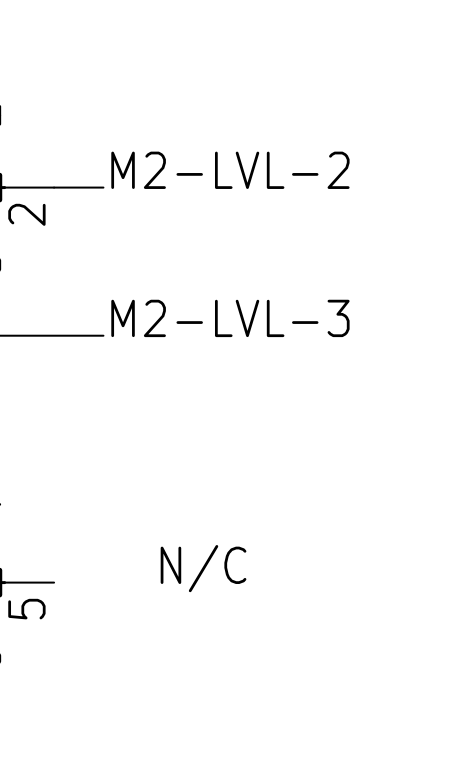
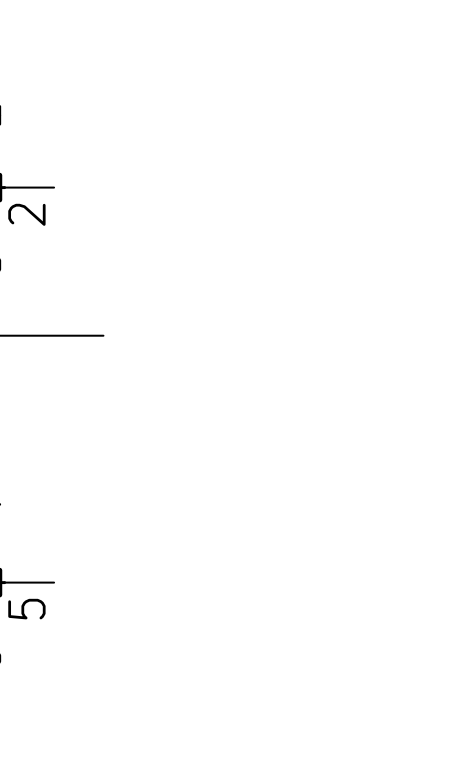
label: M2-LVL-2 (230, 170) -> none
wire: (54, 187) (103, 187) -> none
label: M2-LVL-3 (230, 318) -> none
text: N/C (203, 568) -> none

